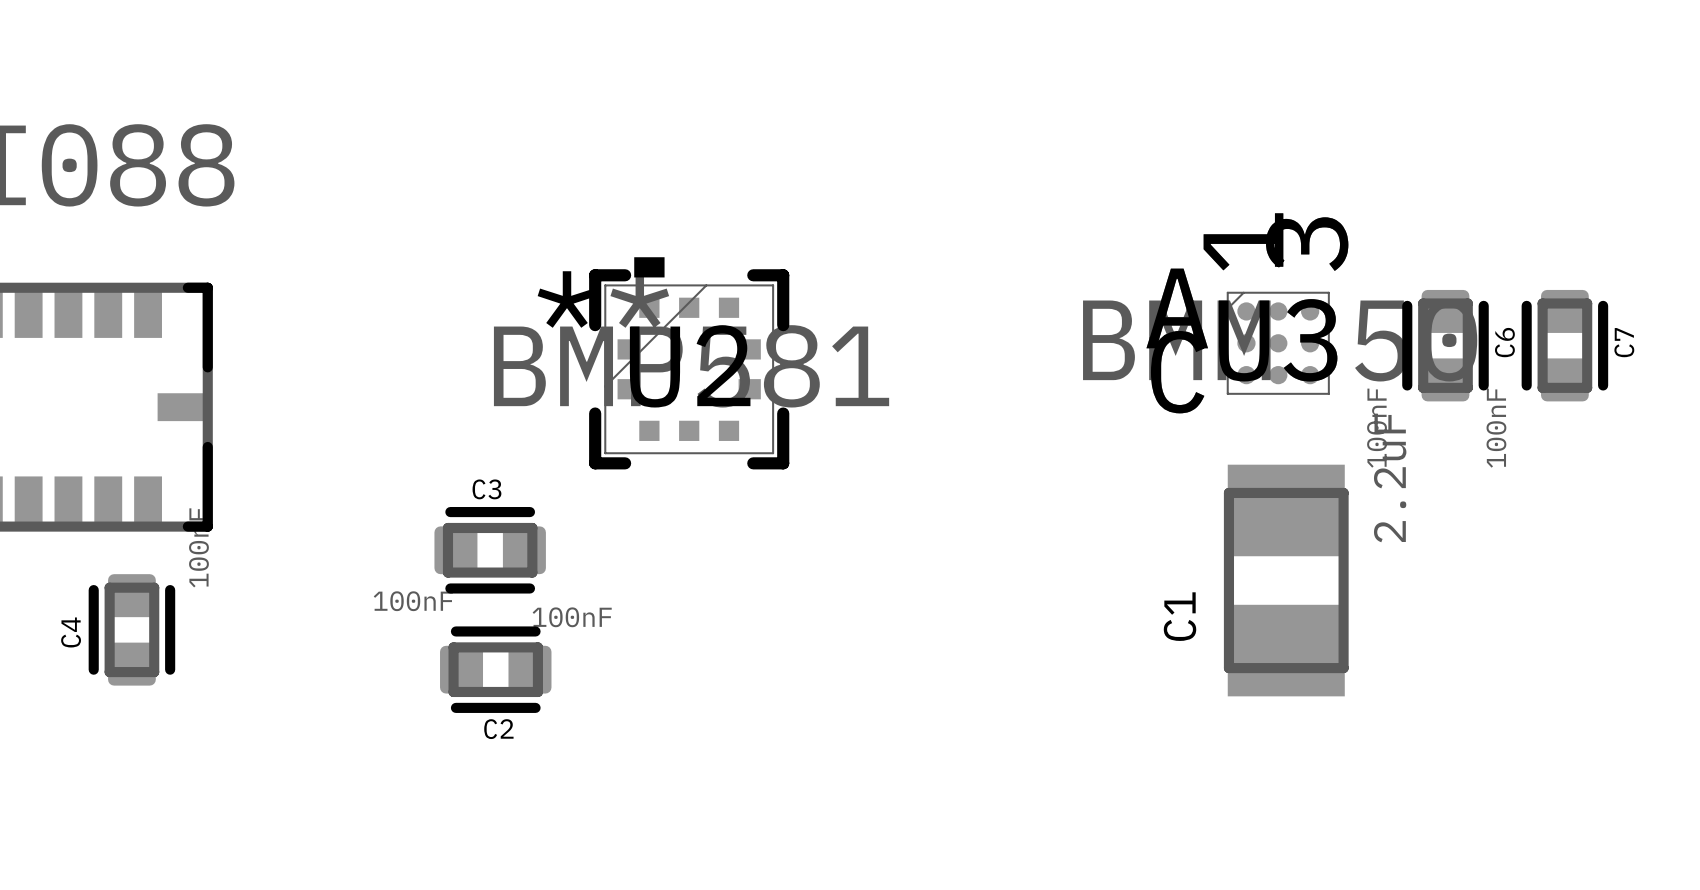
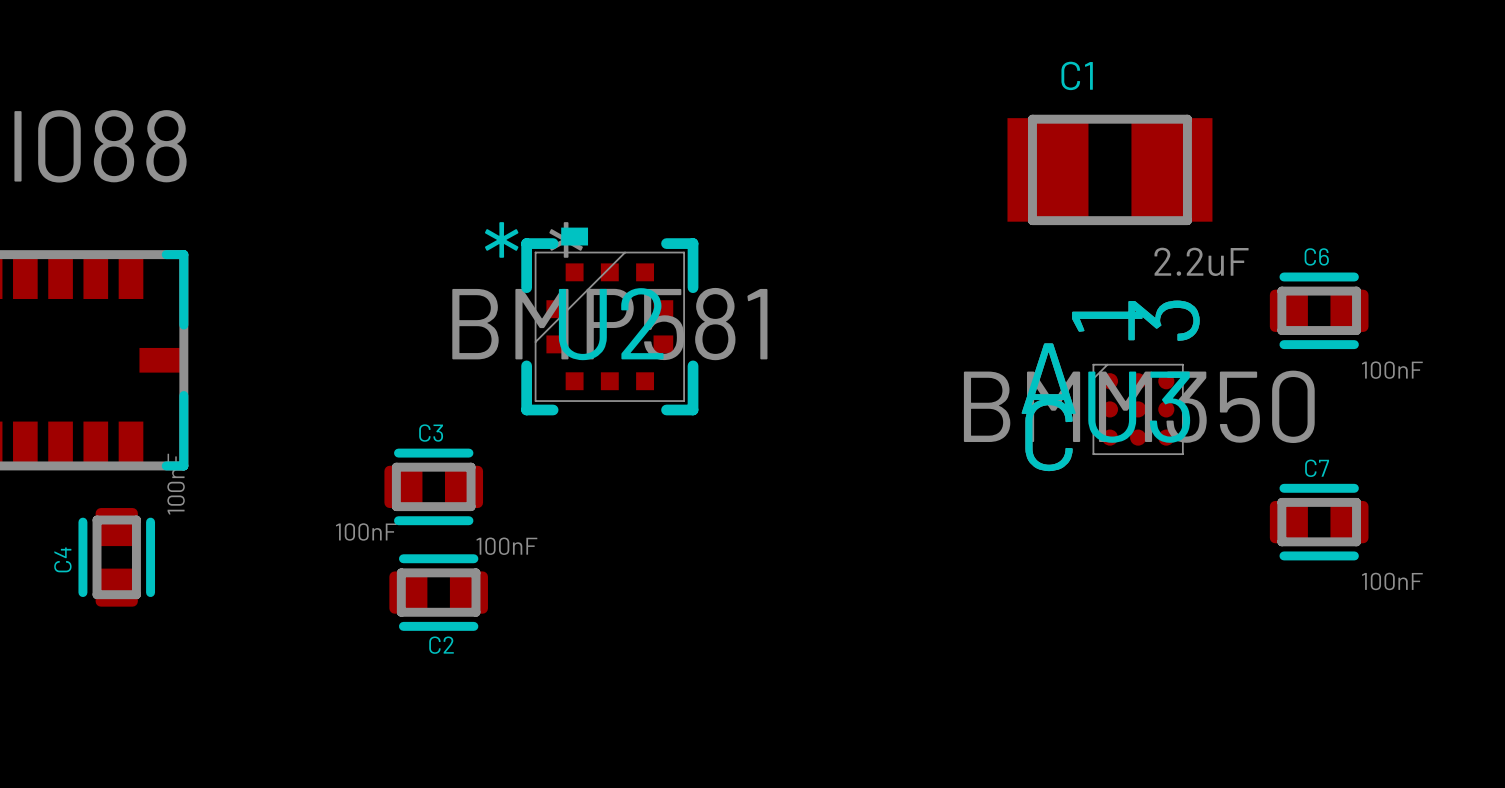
U3 position: (1278, 343) -> (1138, 409)
C6 rotation: 0° (1445, 345) -> 90° clockwise (1319, 310)
C7 rotation: 0° (1564, 345) -> 90° clockwise (1319, 522)
C7 position: (1564, 345) -> (1319, 522)
C1 rotation: 0° (1286, 580) -> 90° clockwise (1109, 169)
C1 position: (1286, 580) -> (1109, 169)

